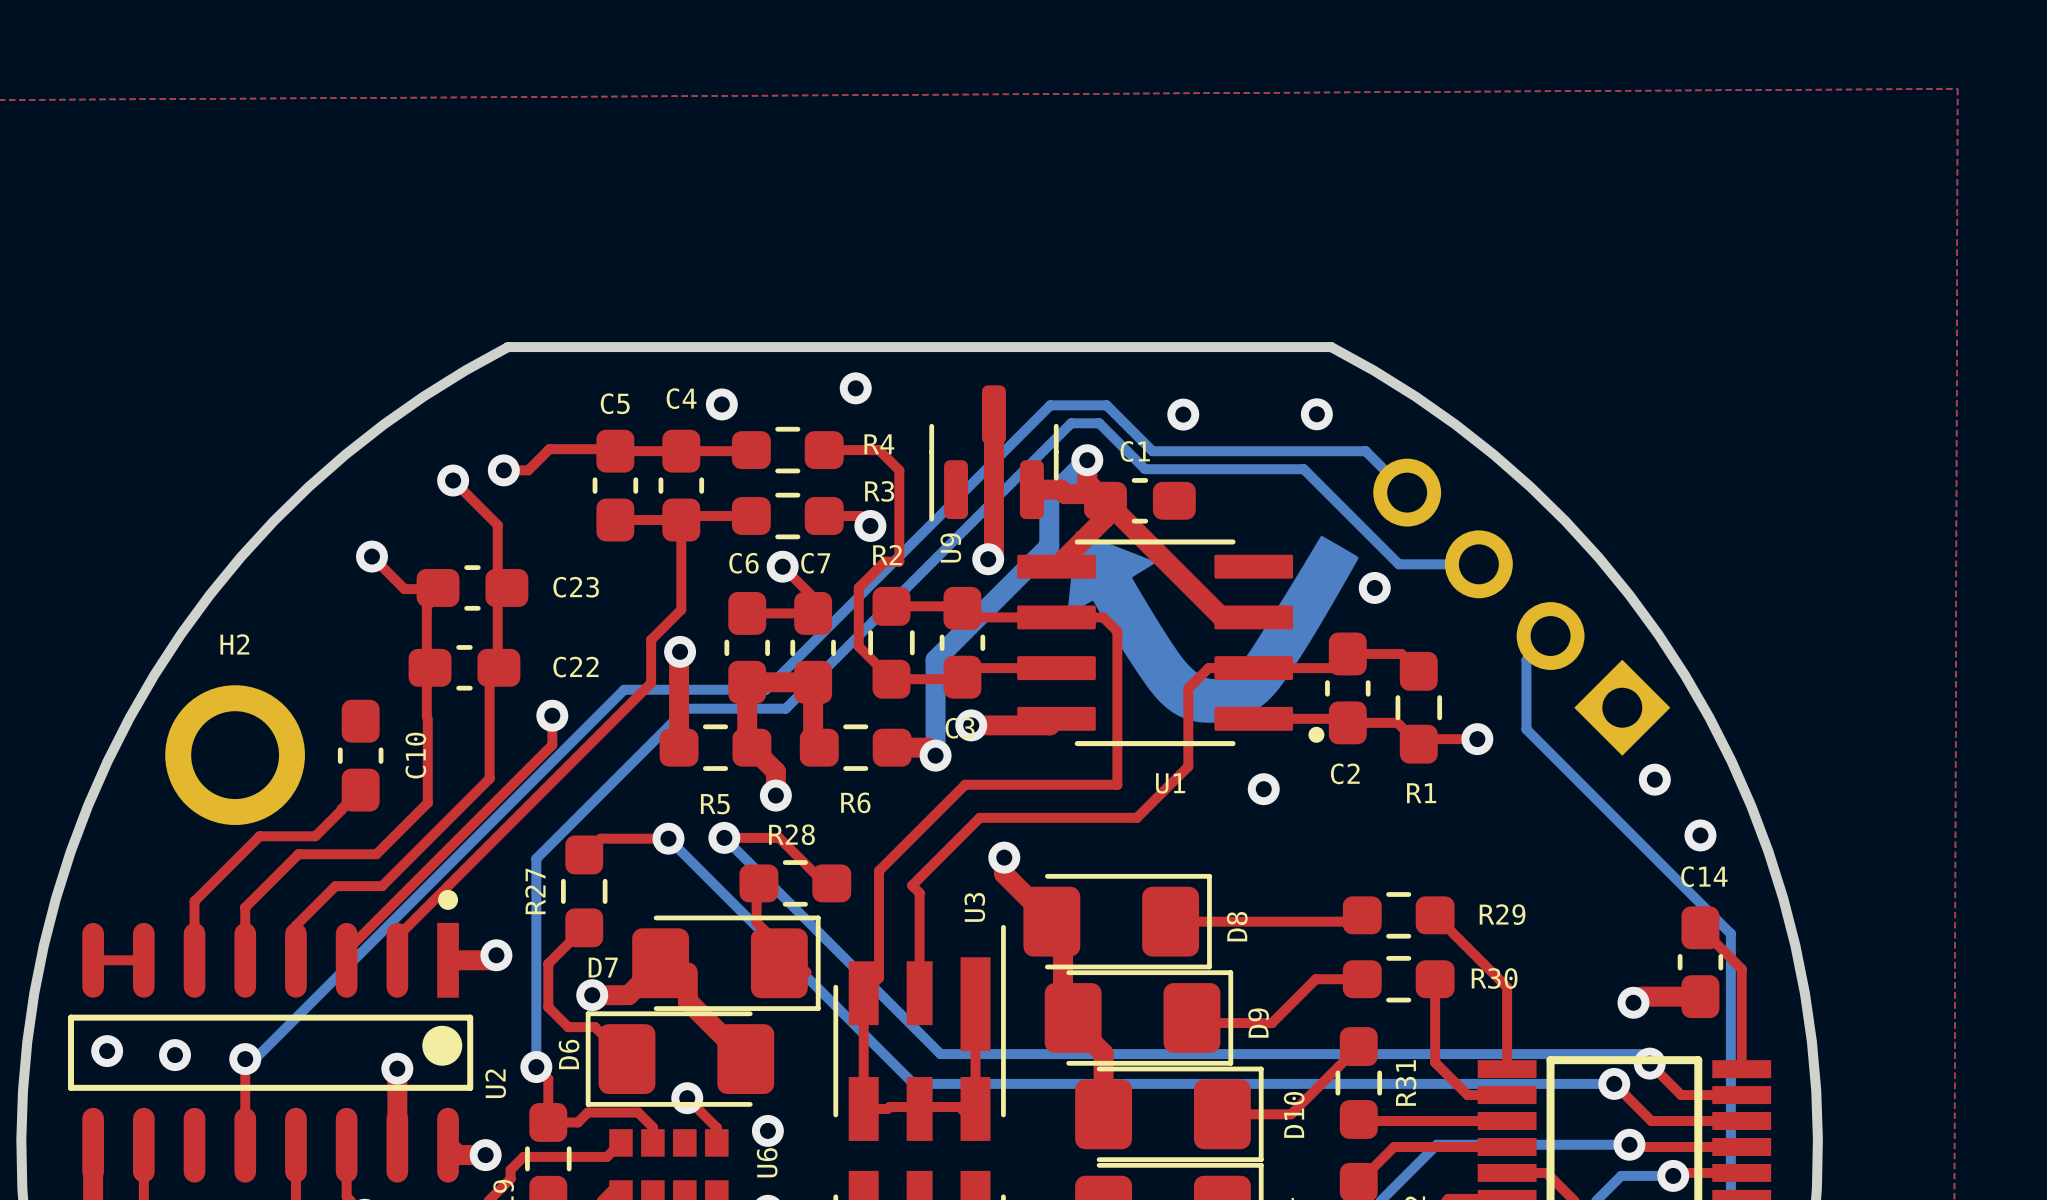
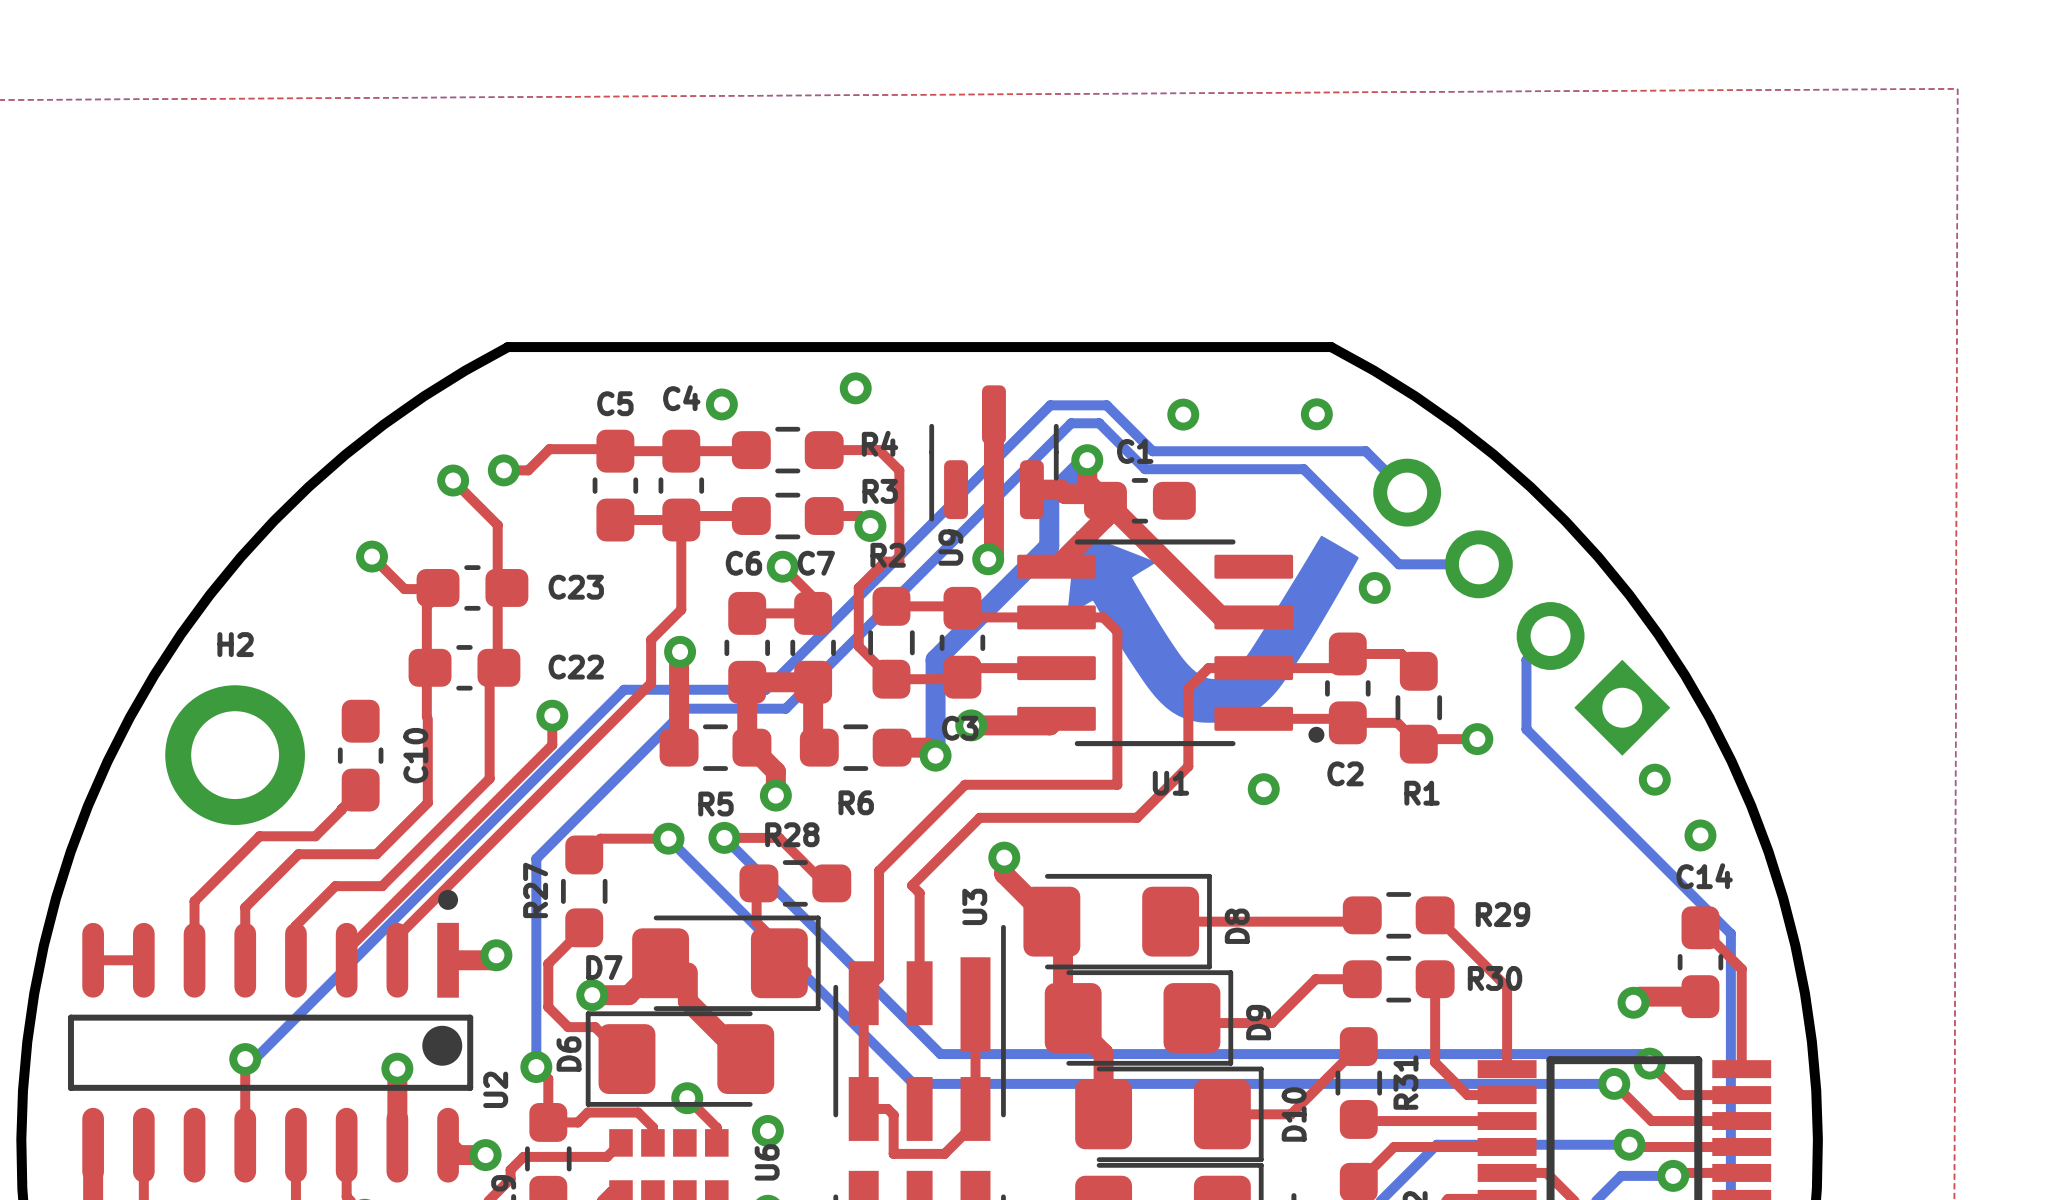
via: (107, 1051) -> none
via: (175, 1055) -> none
top track: (887, 1108) (889, 1106) (959, 1106) (975, 1122) -> (887, 1108) (893, 1114) (893, 1153) (944, 1153) (975, 1122)

